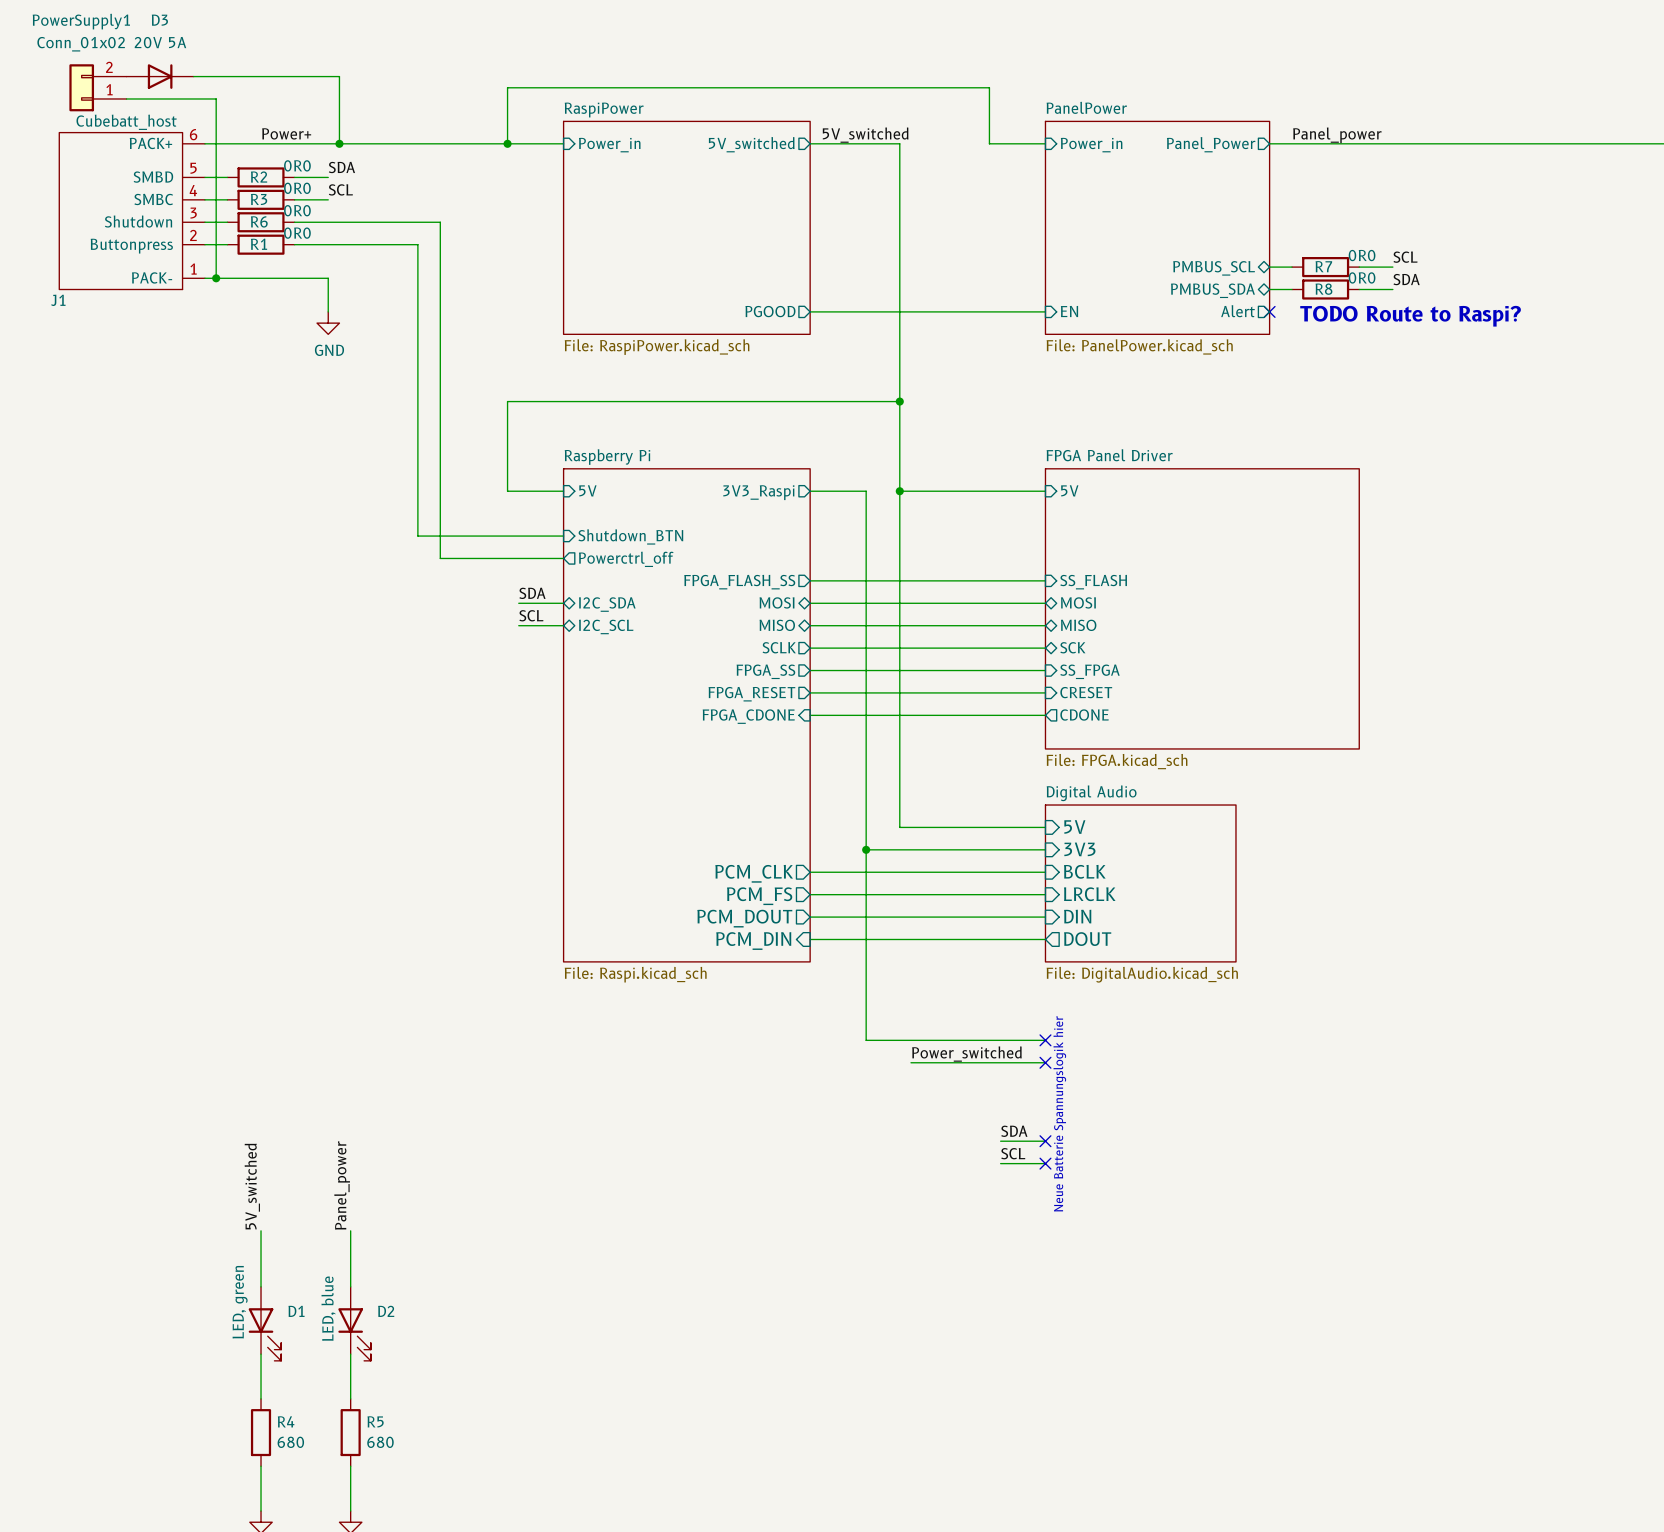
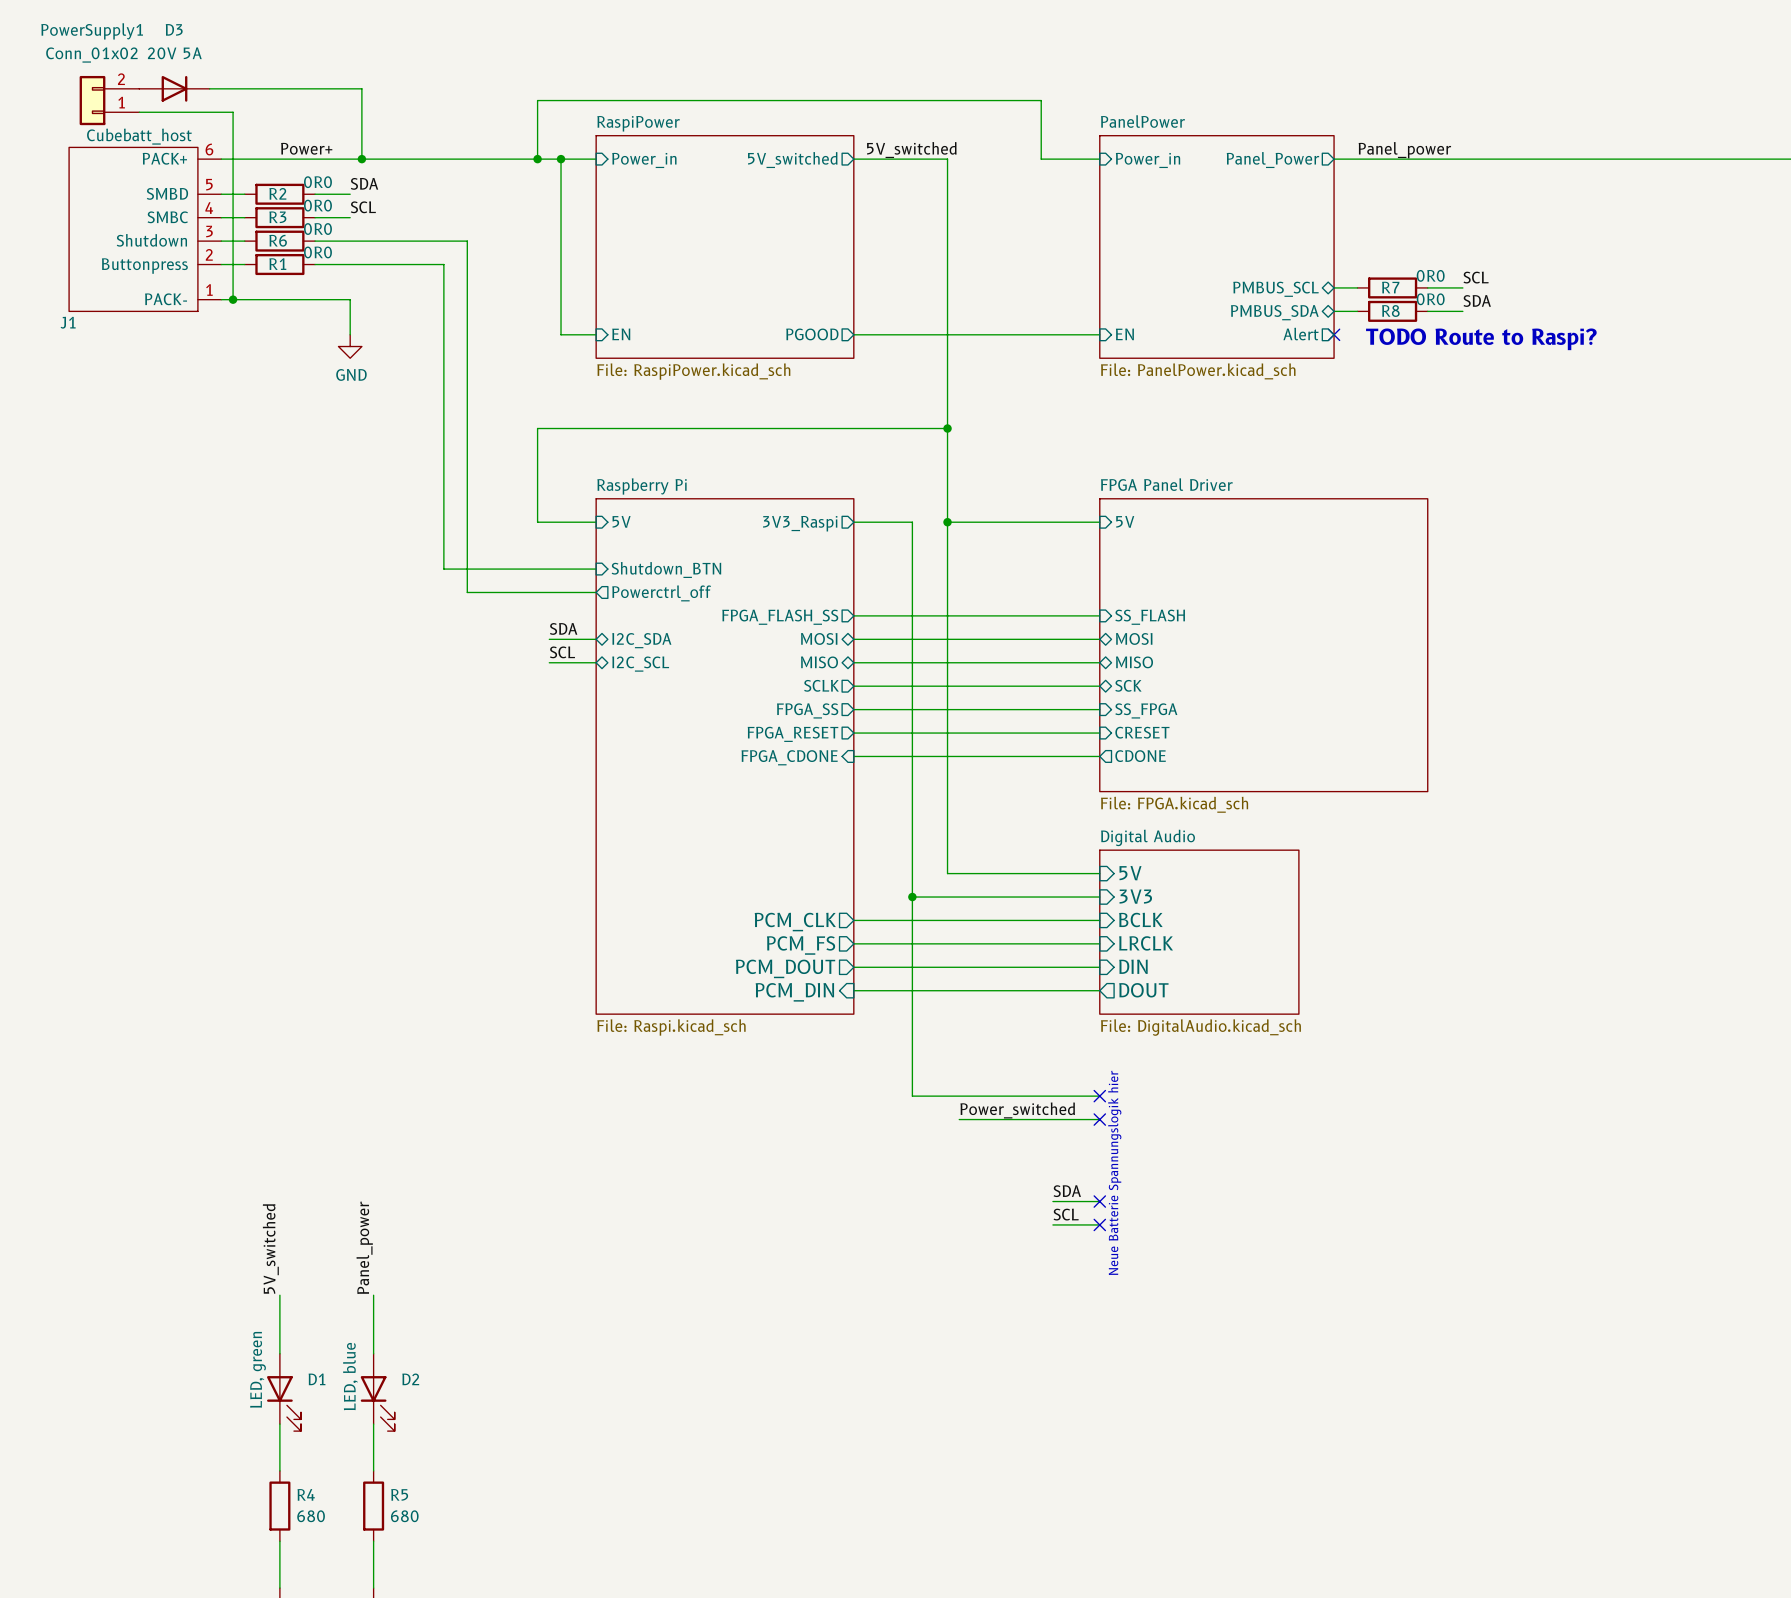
wire: none -> (561, 159) (561, 334) (596, 334)
junction: none -> (561, 159)
sheet pin: none -> EN (621, 334)

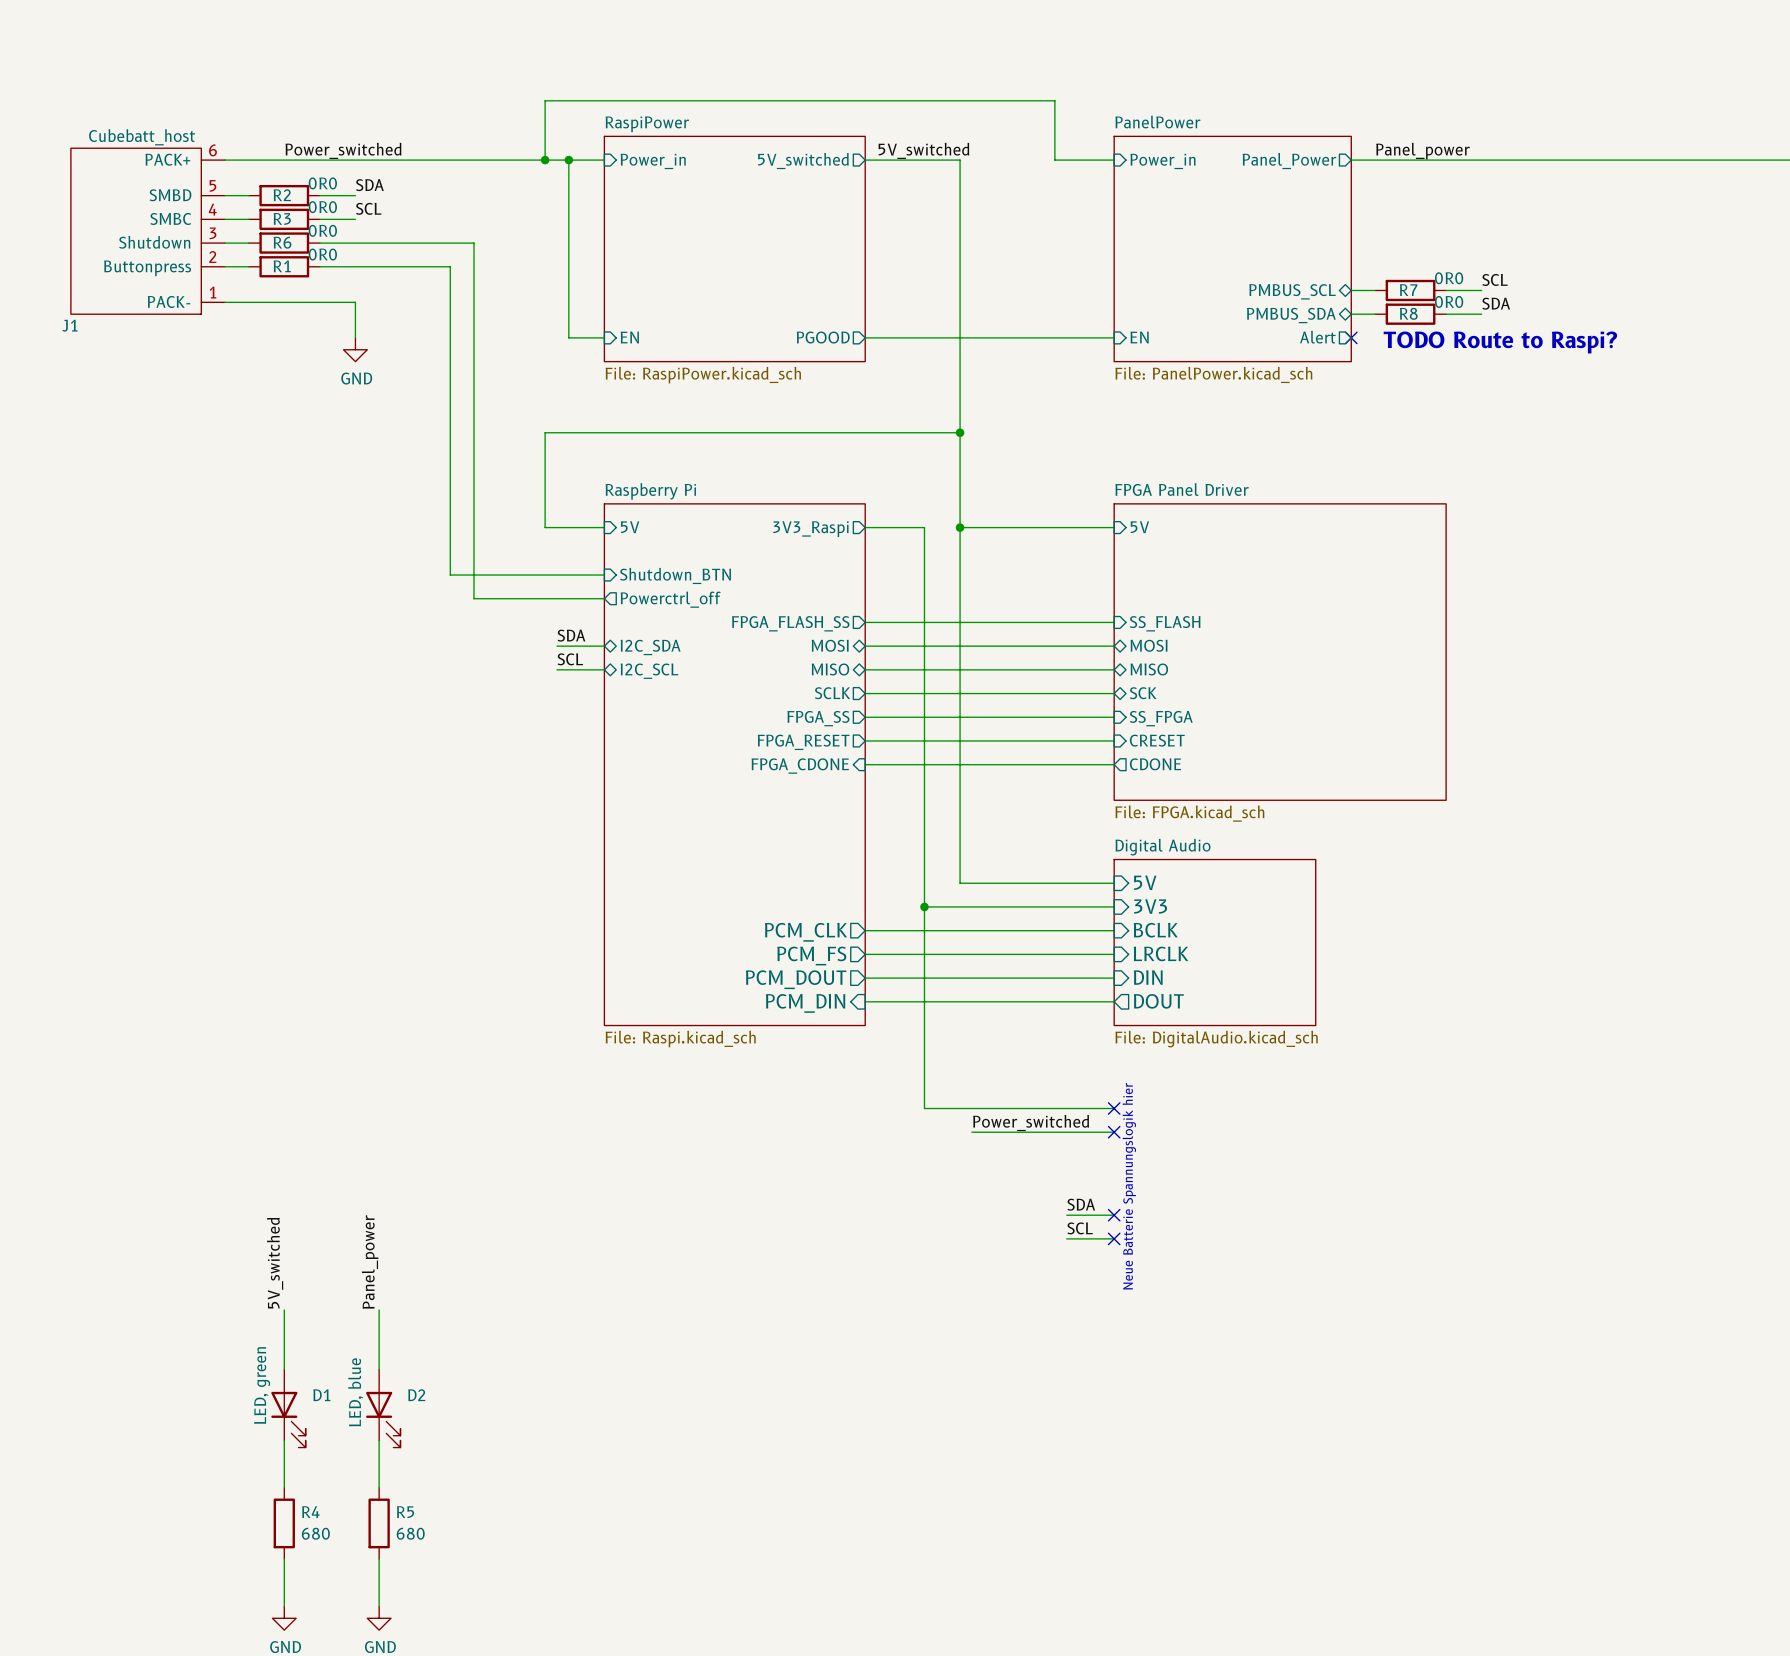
D3: 20V 5A (174, 88) -> none
wire: (209, 88) (361, 88) (361, 159) -> none
PowerSupply1: Conn_01x02 (109, 100) -> none
wire: (139, 112) (233, 112) (233, 299) -> none
label: Power+ (306, 148) -> Power_switched (343, 150)
junction: (361, 159) -> none
junction: (233, 299) -> none

